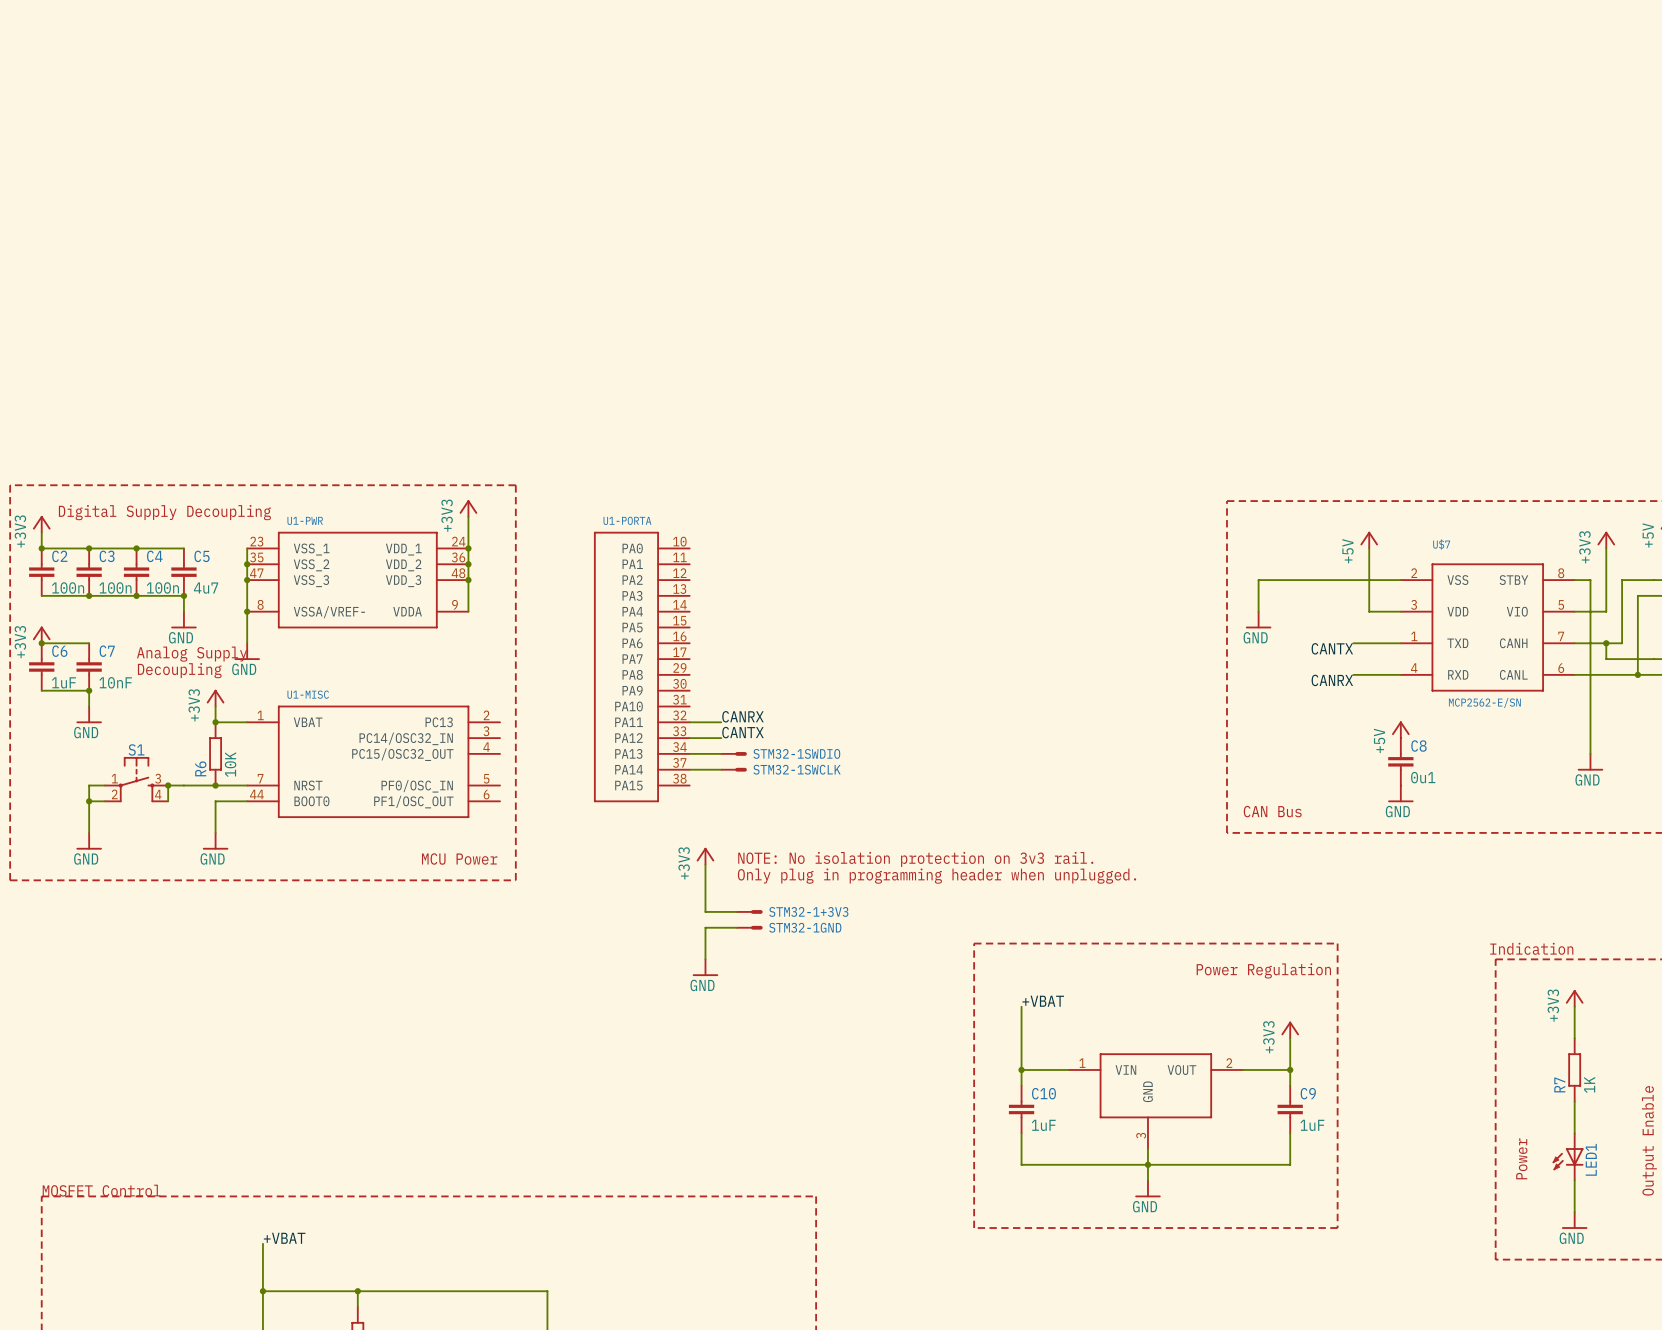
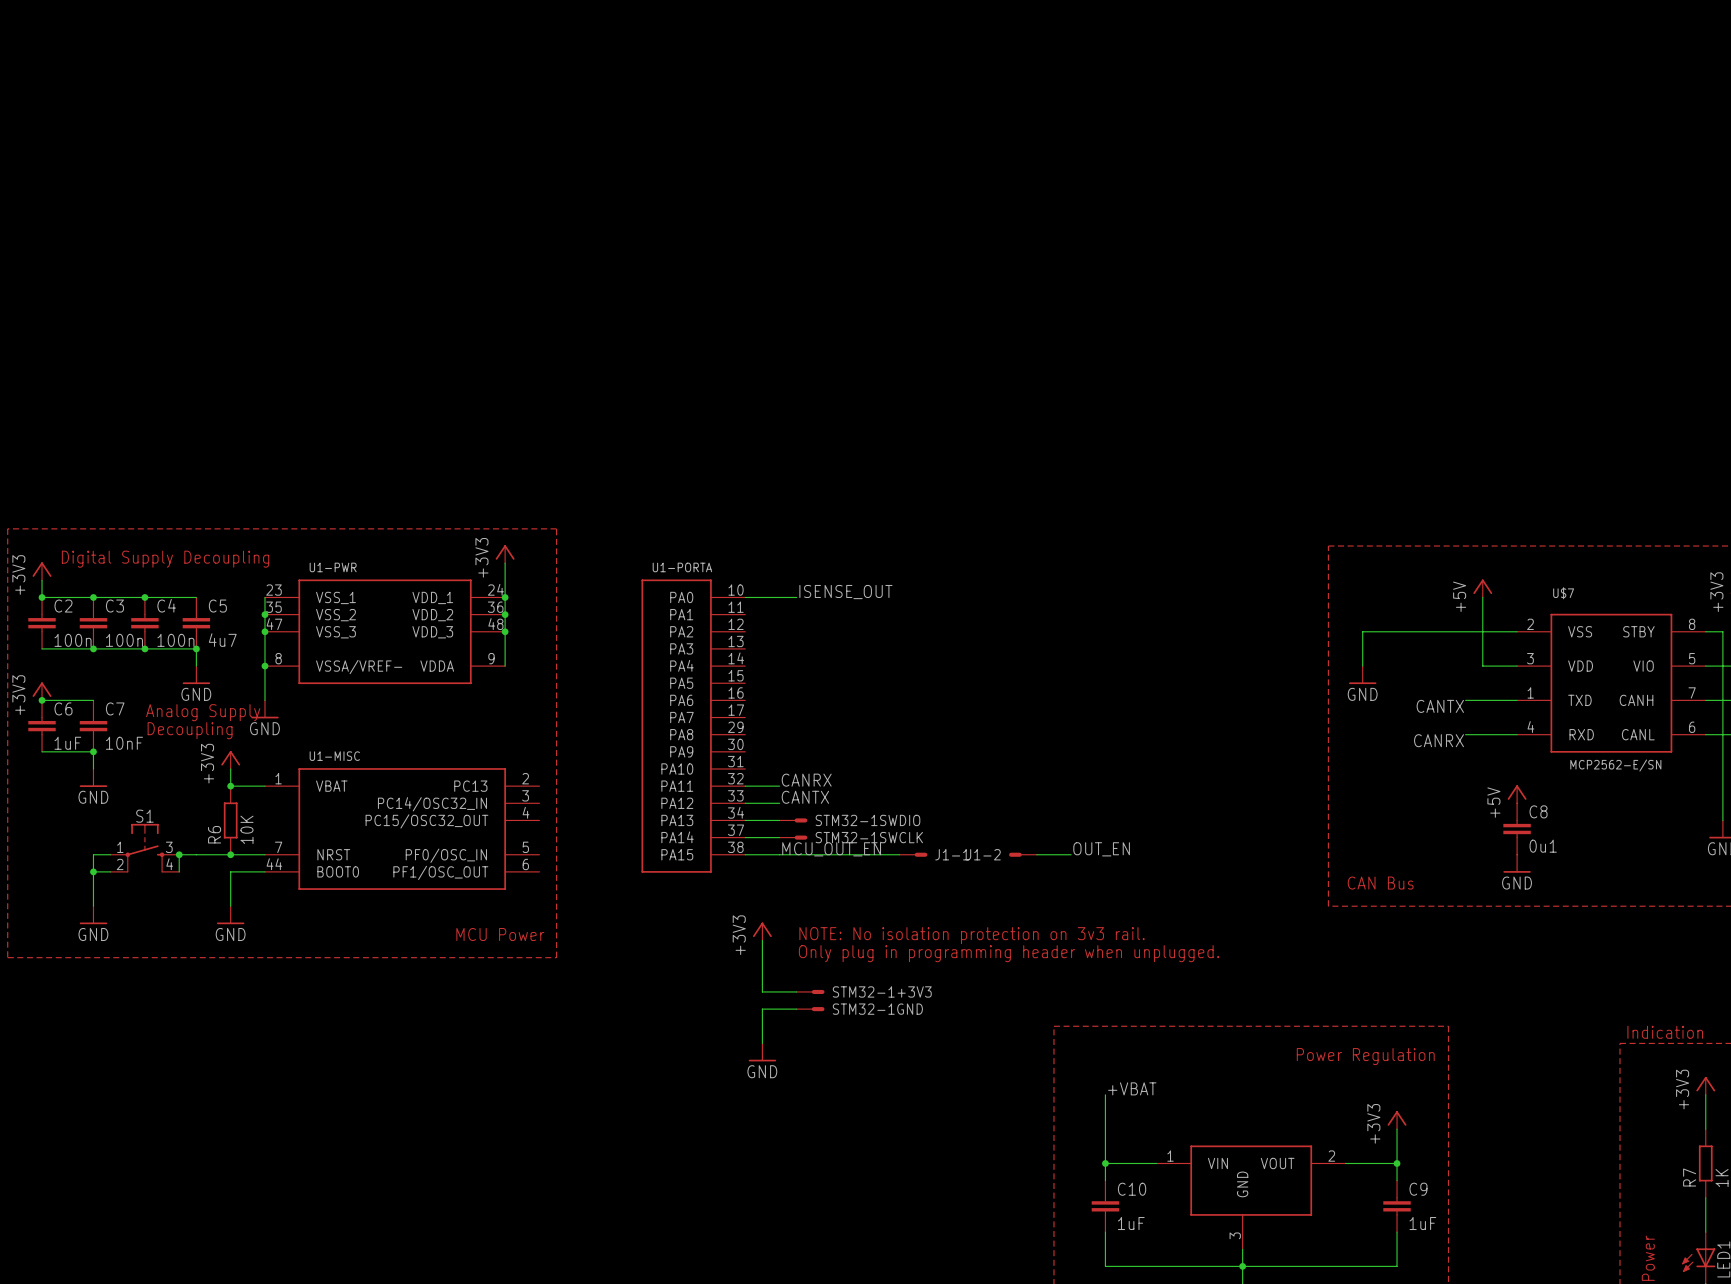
label: none -> ISENSE_OUT (845, 592)
wire: none -> (745, 597) (796, 597)
label: none -> MCU_OUT_EN (831, 849)
label: none -> OUT_EN (1101, 849)
wire: none -> (745, 854) (899, 854)
J1-1: none -> (913, 854)
J1-2: none -> (1022, 854)
wire: none -> (1036, 854) (1071, 854)

